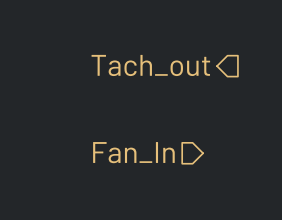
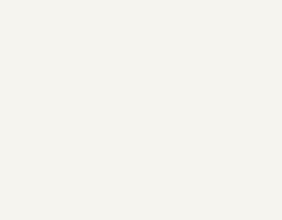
hierarchical label: Tach_out (150, 65) -> none
hierarchical label: Fan_In (133, 152) -> none

